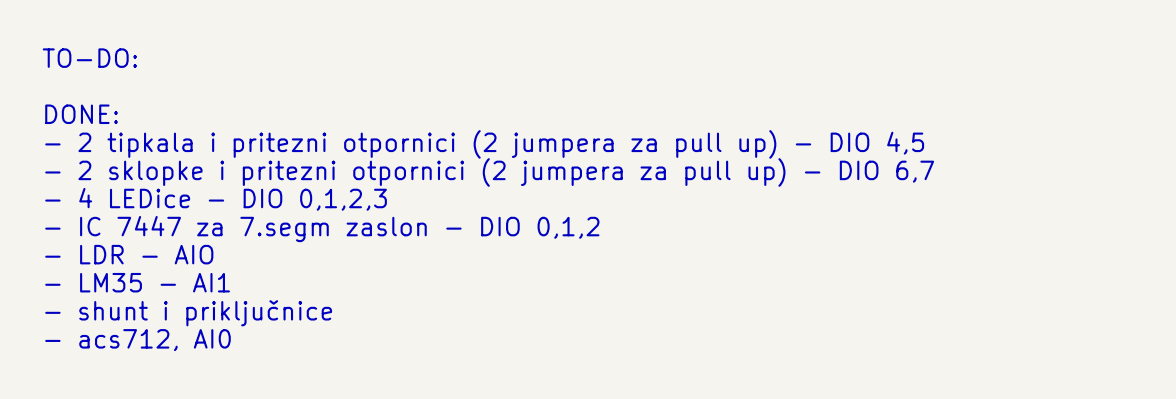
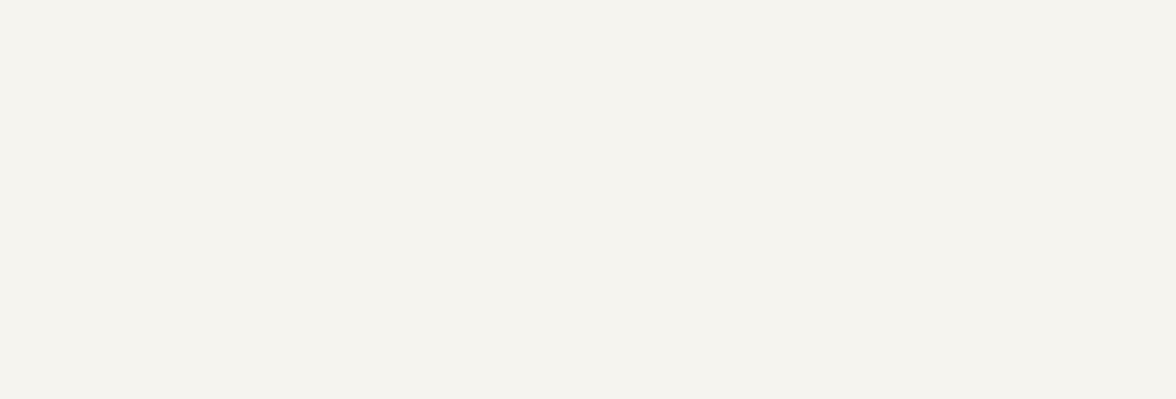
text: TO-DO: (89, 58) -> none
text: DONE: (81, 114) -> none
text: - 2 tipkala i pritezni otpornici (2 jumpera za pull up) - DIO 4,5 (484, 144) -> none
text: - 2 sklopke i pritezni otpornici (2 jumpera za pull up) - DIO 6,7 (489, 172) -> none
text: - 4 LEDice - DIO 0,1,2,3 (216, 199) -> none
text: - IC 7447 za 7.segm zaslon - DIO 0,1,2 (322, 229) -> none
text: - LDR - AIO (129, 254) -> none
text: - LM35 - AI1 (137, 282) -> none
text: - shunt i priključnice (188, 313) -> none
text: - acs712, AI0 (138, 340) -> none

